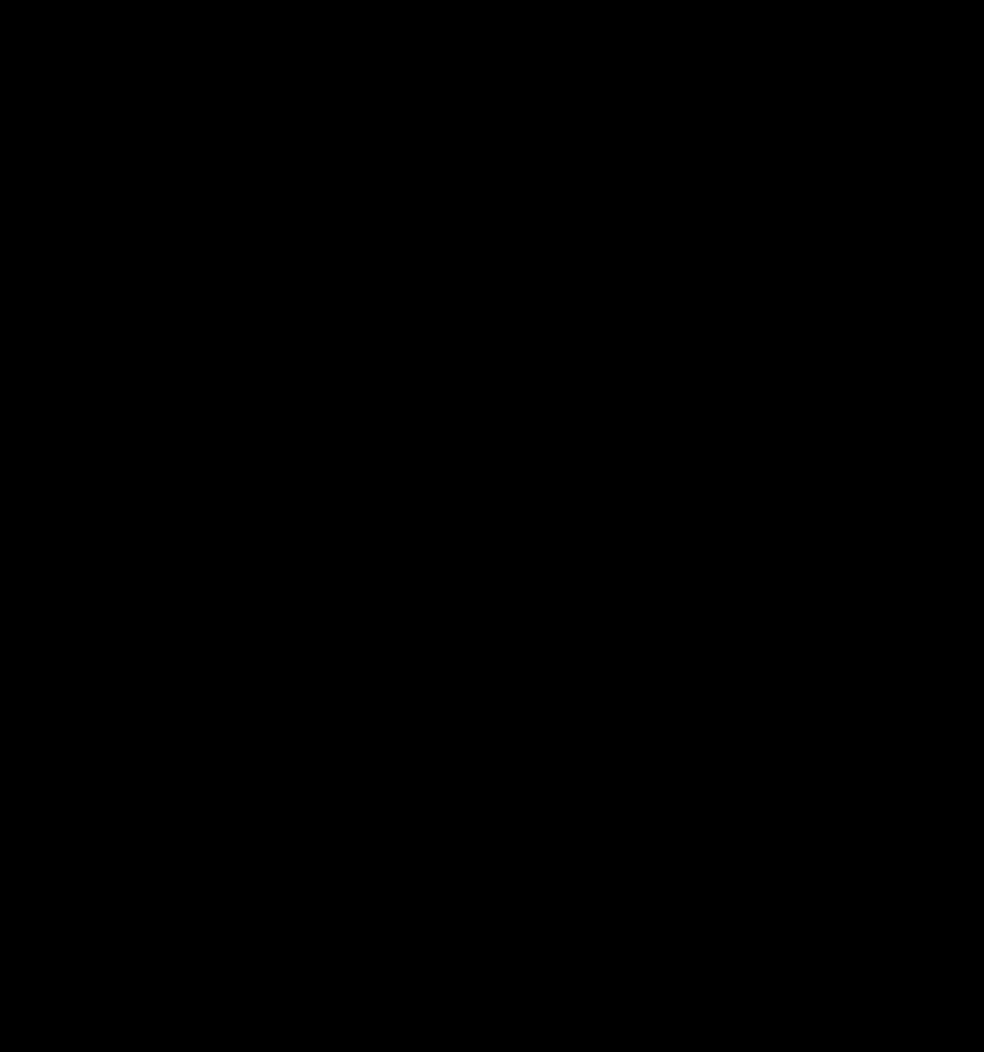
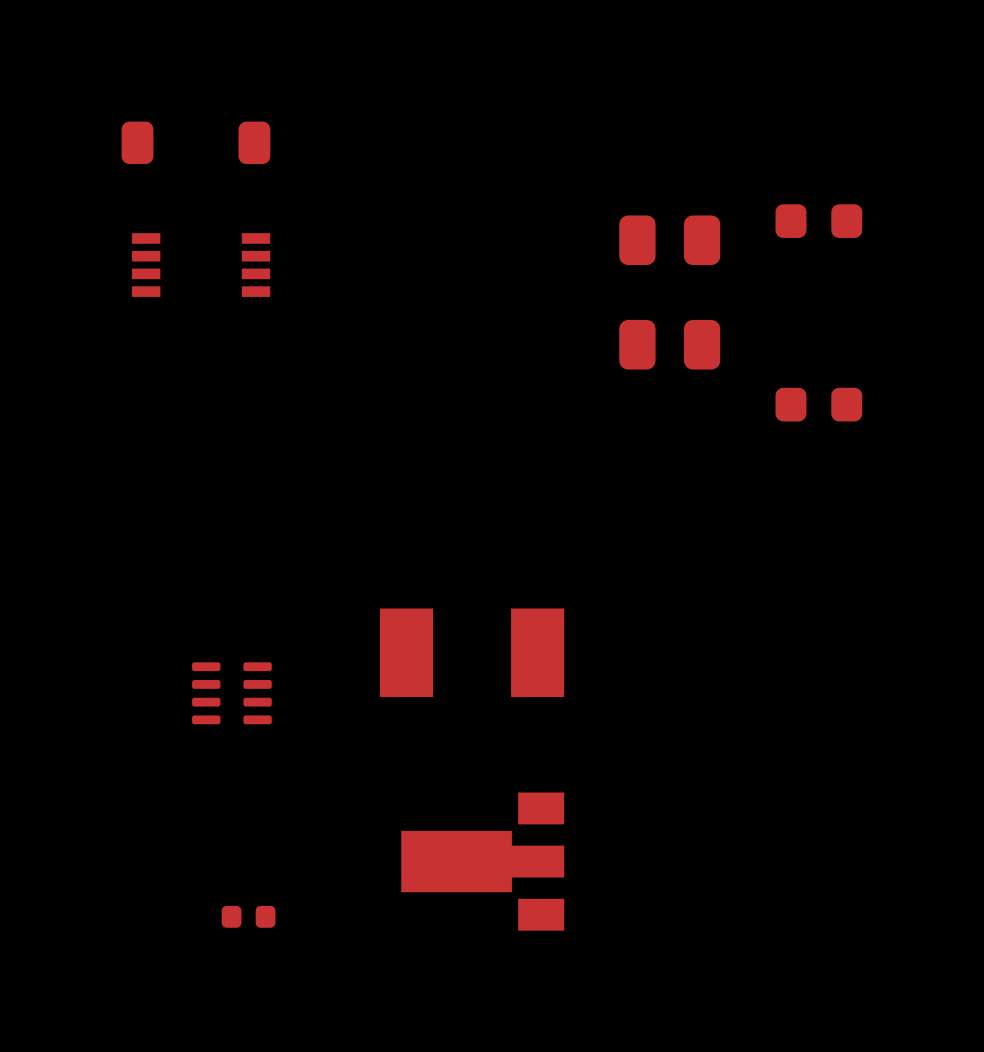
part: none -> (195, 142)
part: none -> (818, 221)
part: none -> (669, 240)
part: none -> (201, 265)
part: none -> (669, 344)
part: none -> (818, 404)
part: none -> (472, 652)
part: none -> (231, 693)
part: none -> (482, 861)
part: none -> (248, 916)

